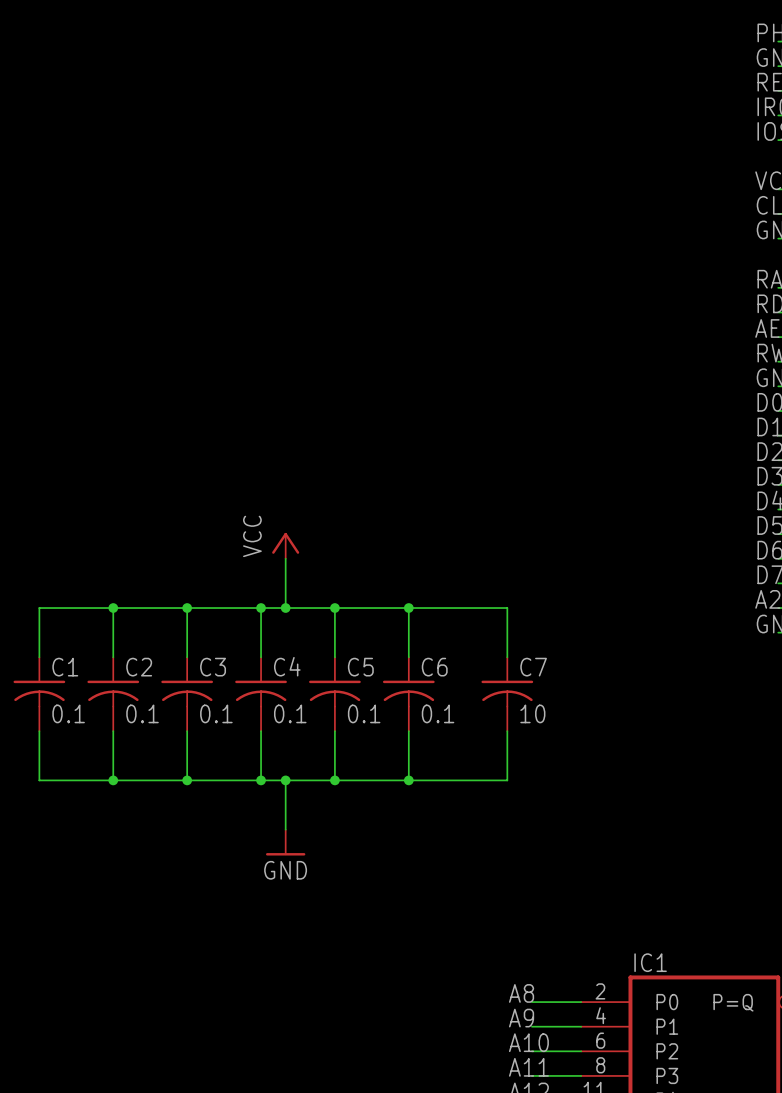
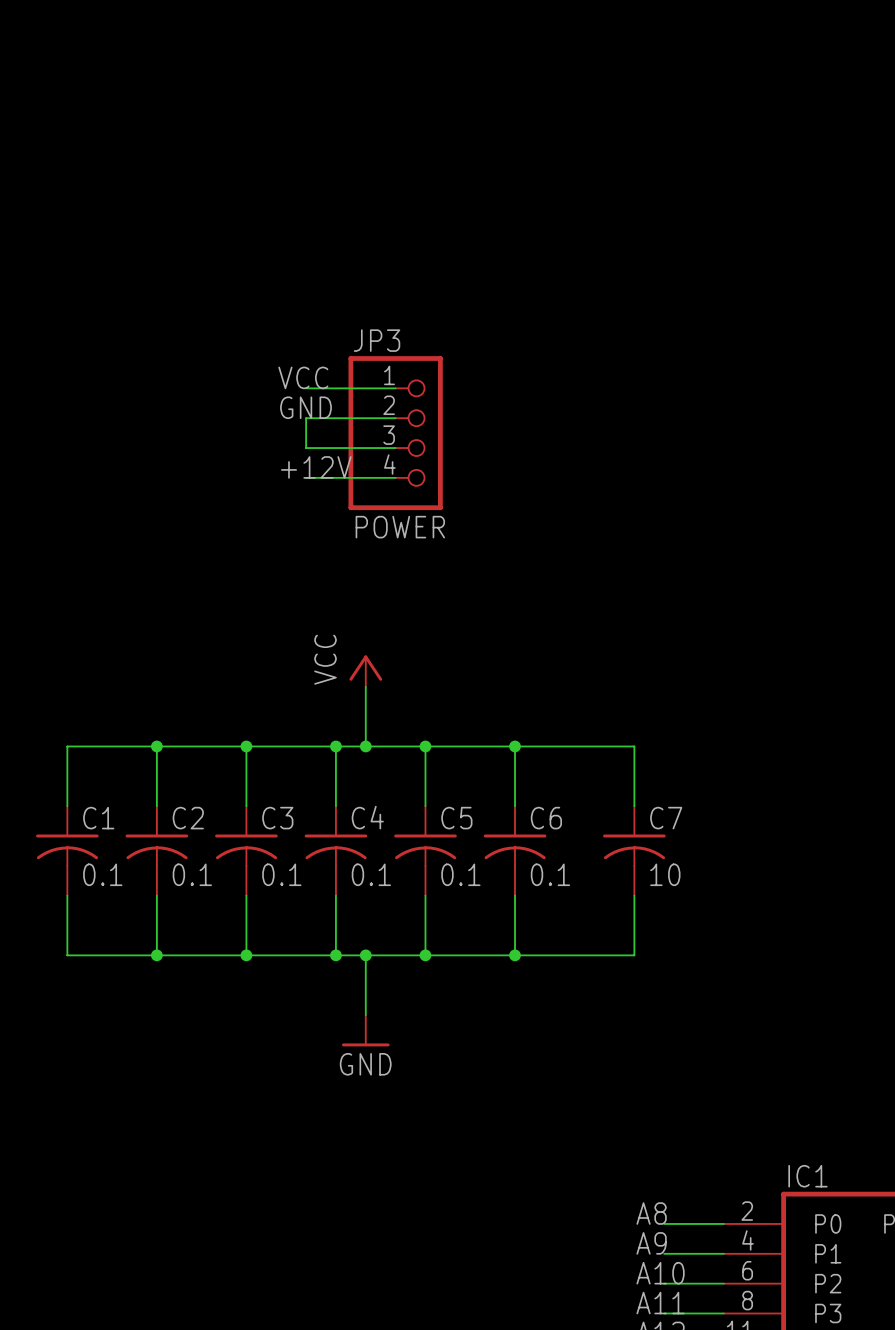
label: none -> VCC (303, 377)
wire: none -> (306, 388) (395, 388)
label: none -> GND (306, 407)
wire: none -> (395, 418) (306, 418) (306, 448) (395, 448)
JP3: none -> POWER (395, 433)
label: none -> +12V (316, 467)
wire: none -> (306, 477) (395, 477)

